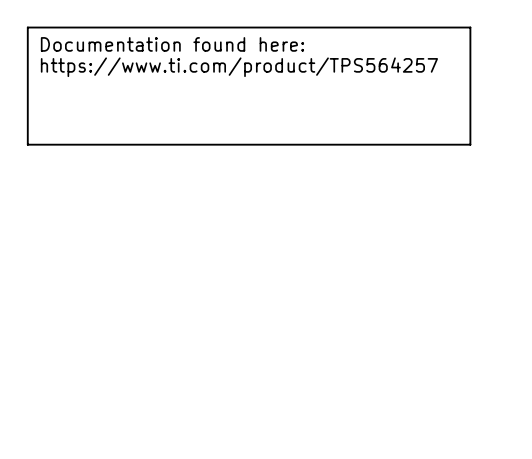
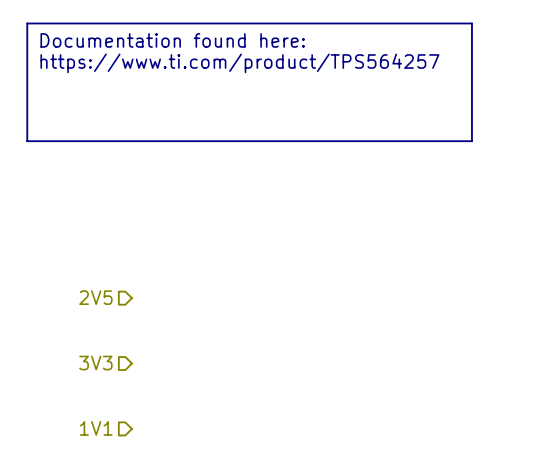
hierarchical label: none -> 2V5 (95, 297)
hierarchical label: none -> 3V3 (95, 363)
hierarchical label: none -> 1V1 (96, 428)

